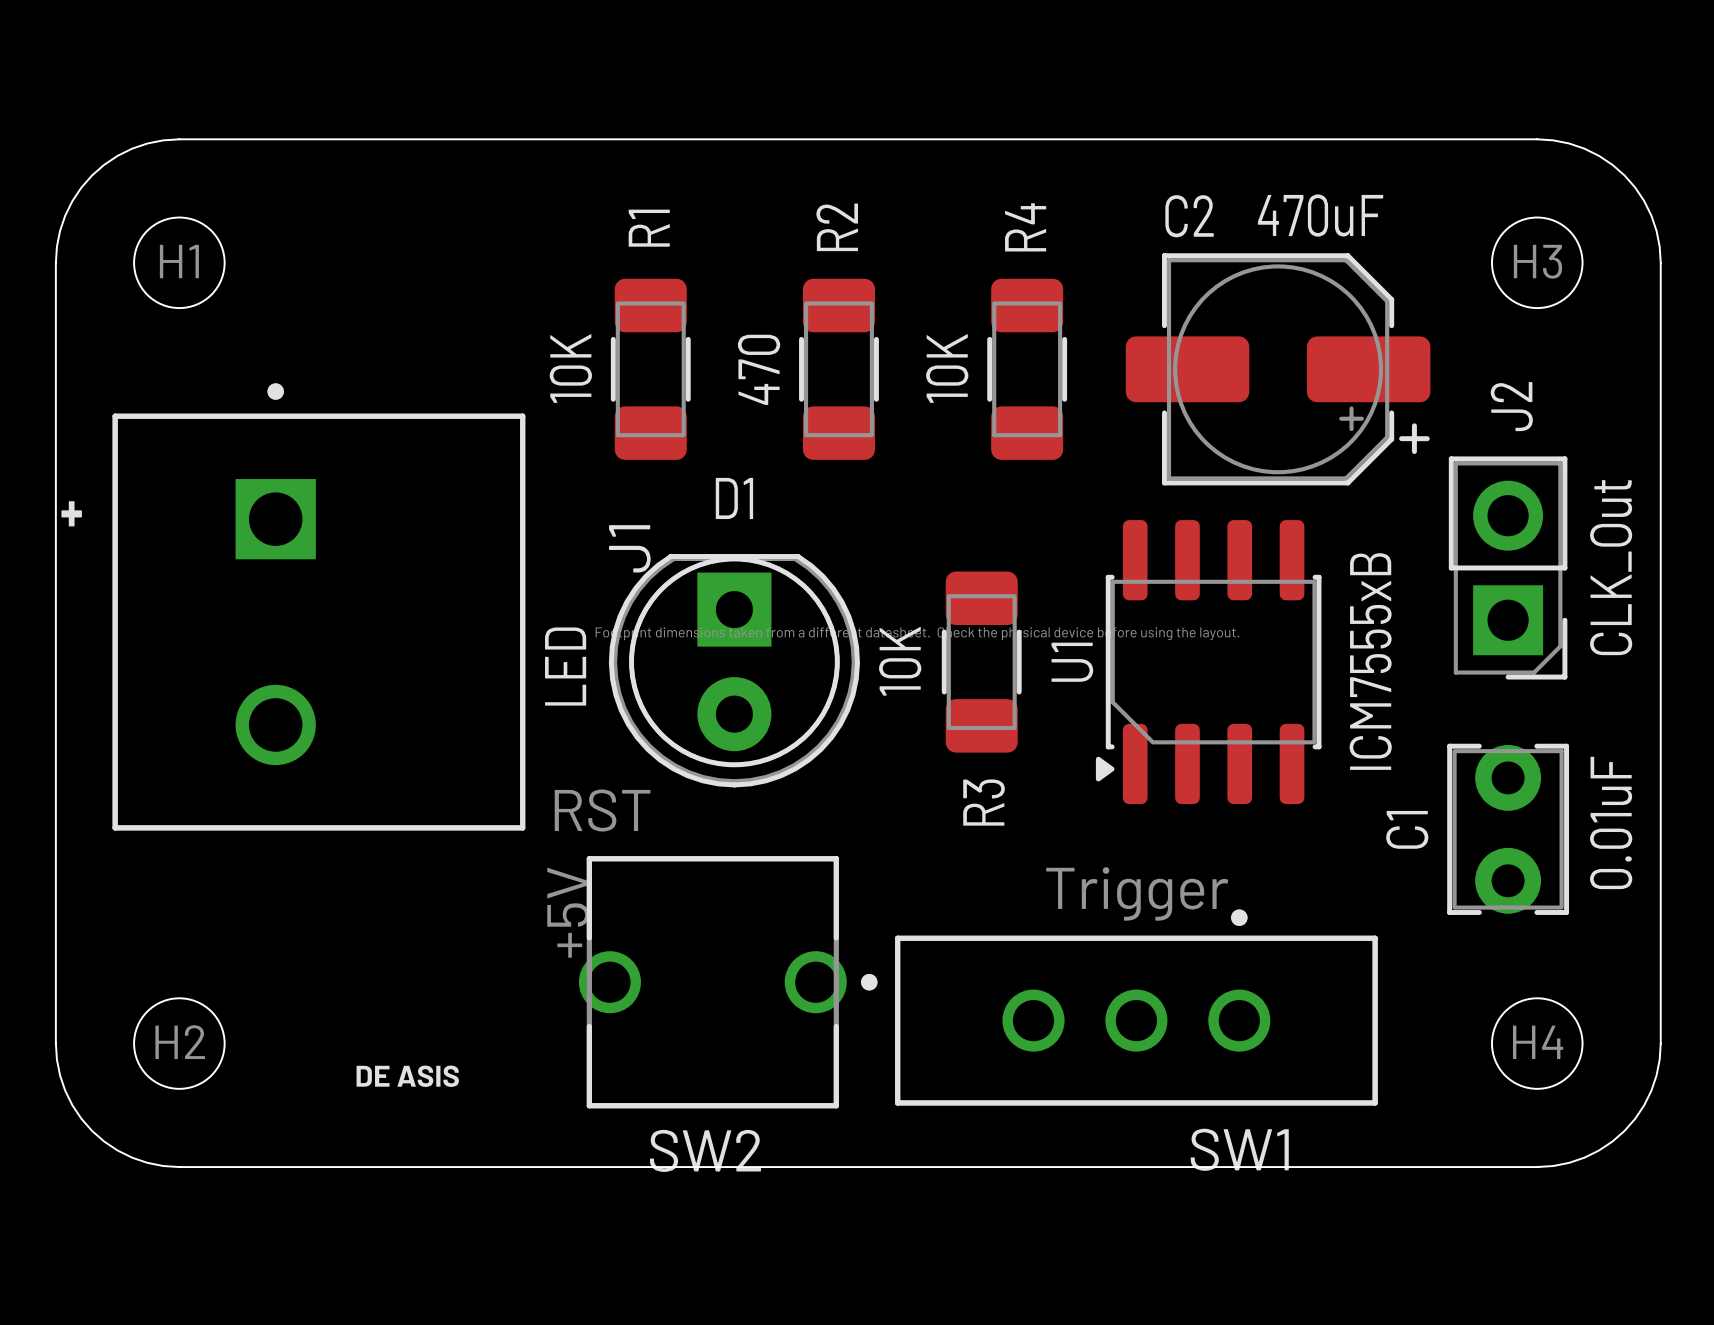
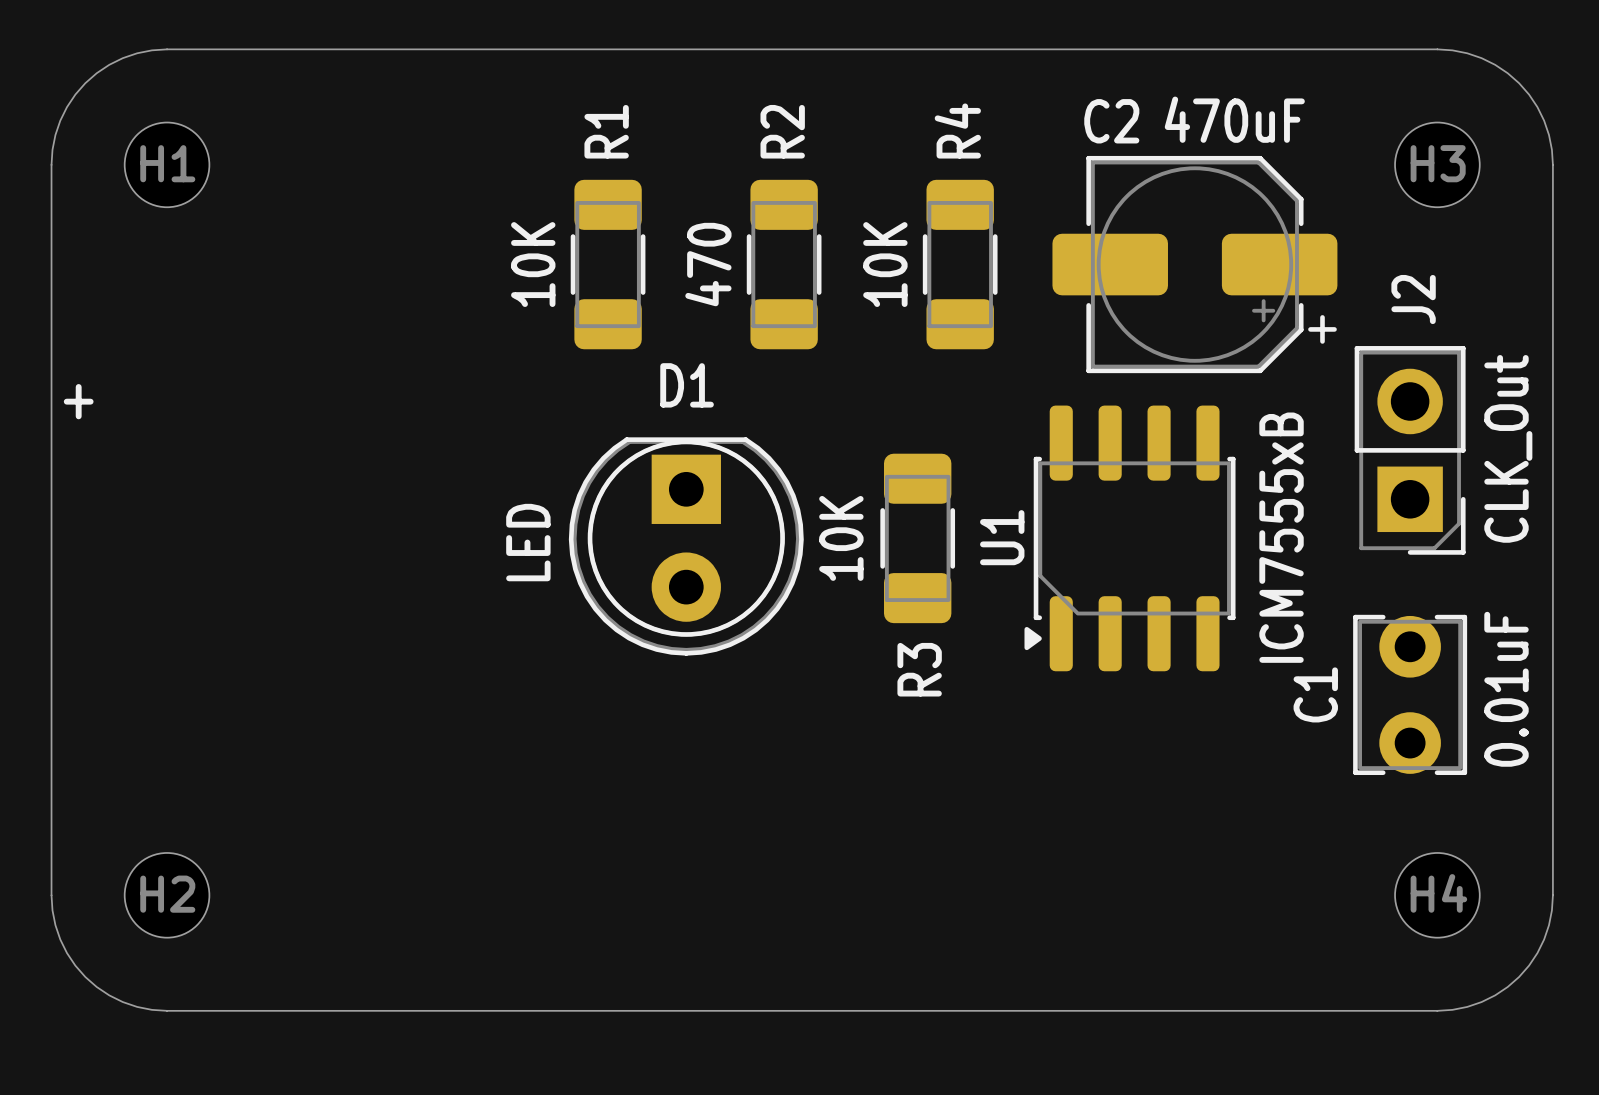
J1: +5V (318, 606) -> none
SW2: RST (728, 982) -> none
SW1: Trigger (1136, 1007) -> none
text: DE ASIS (407, 1076) -> none

